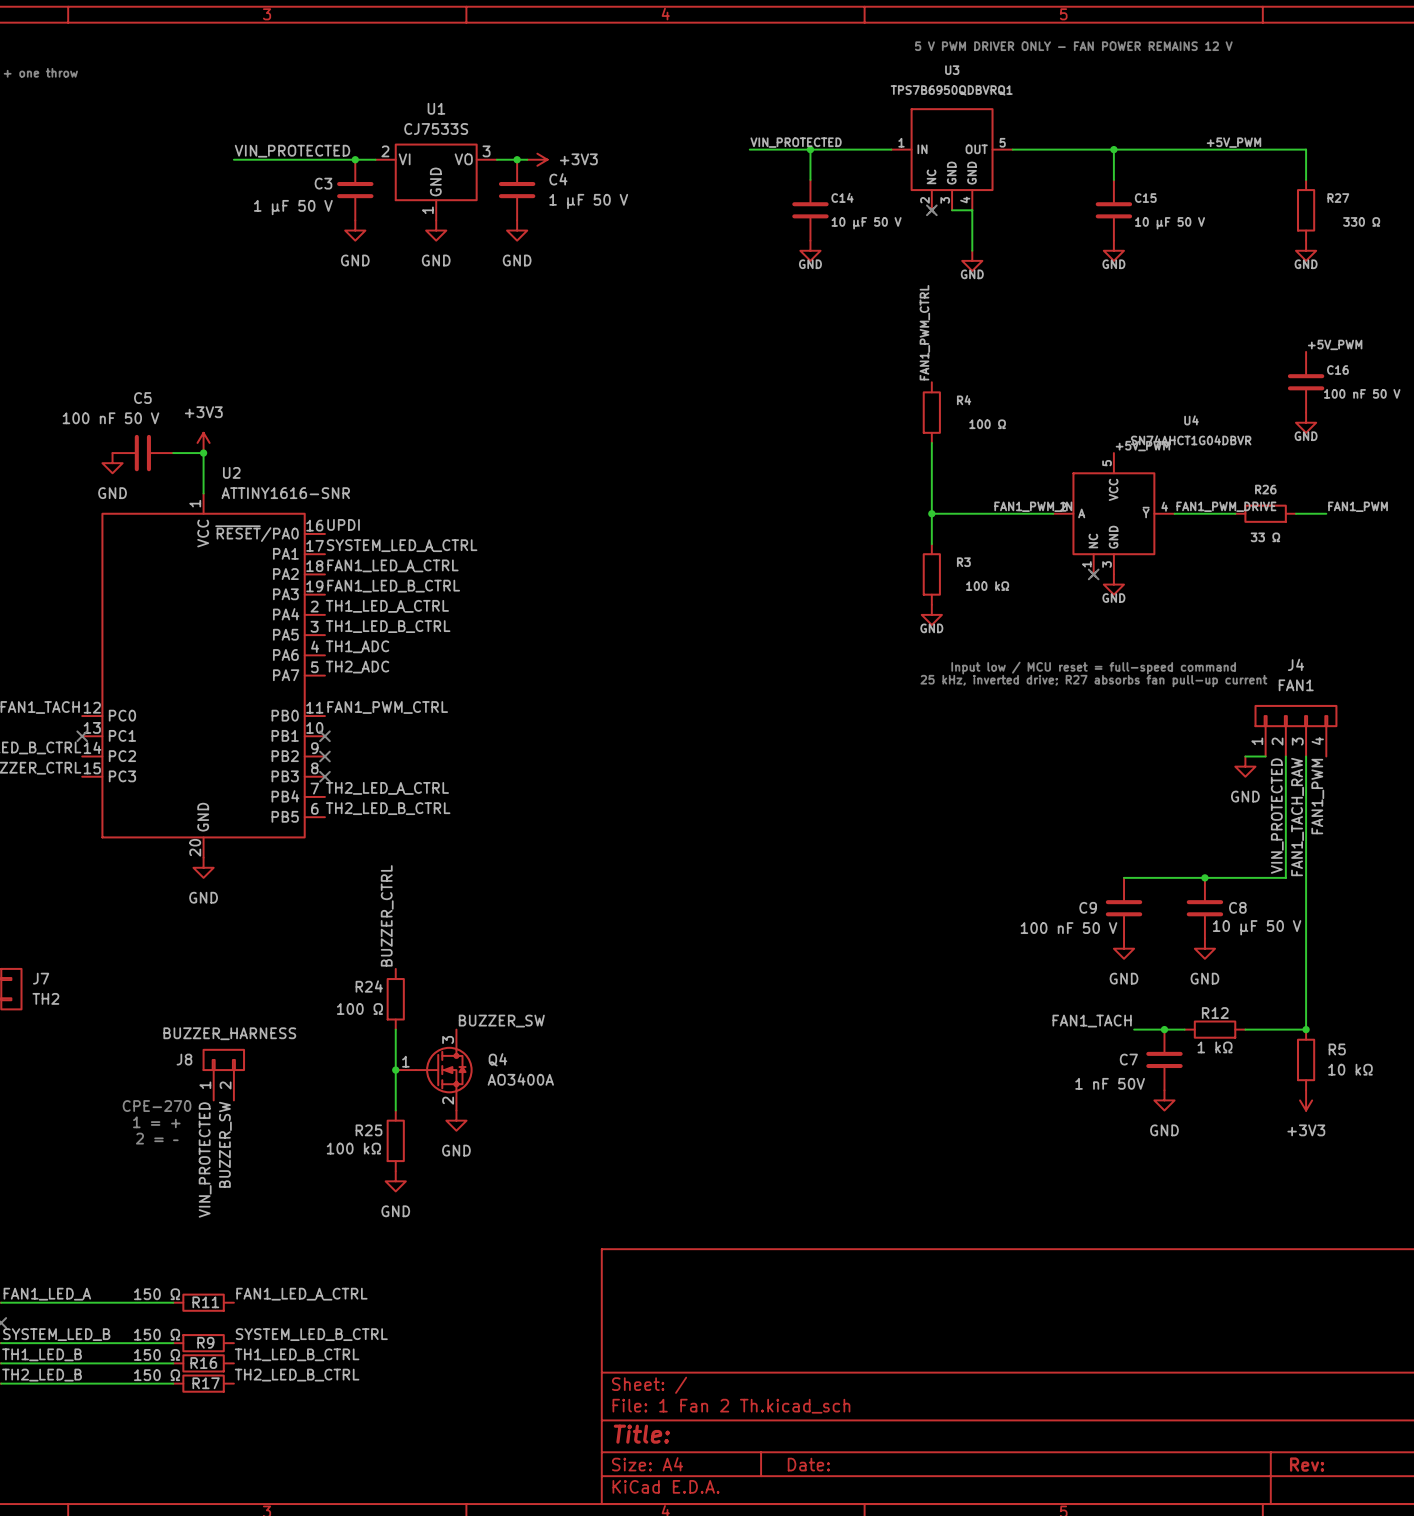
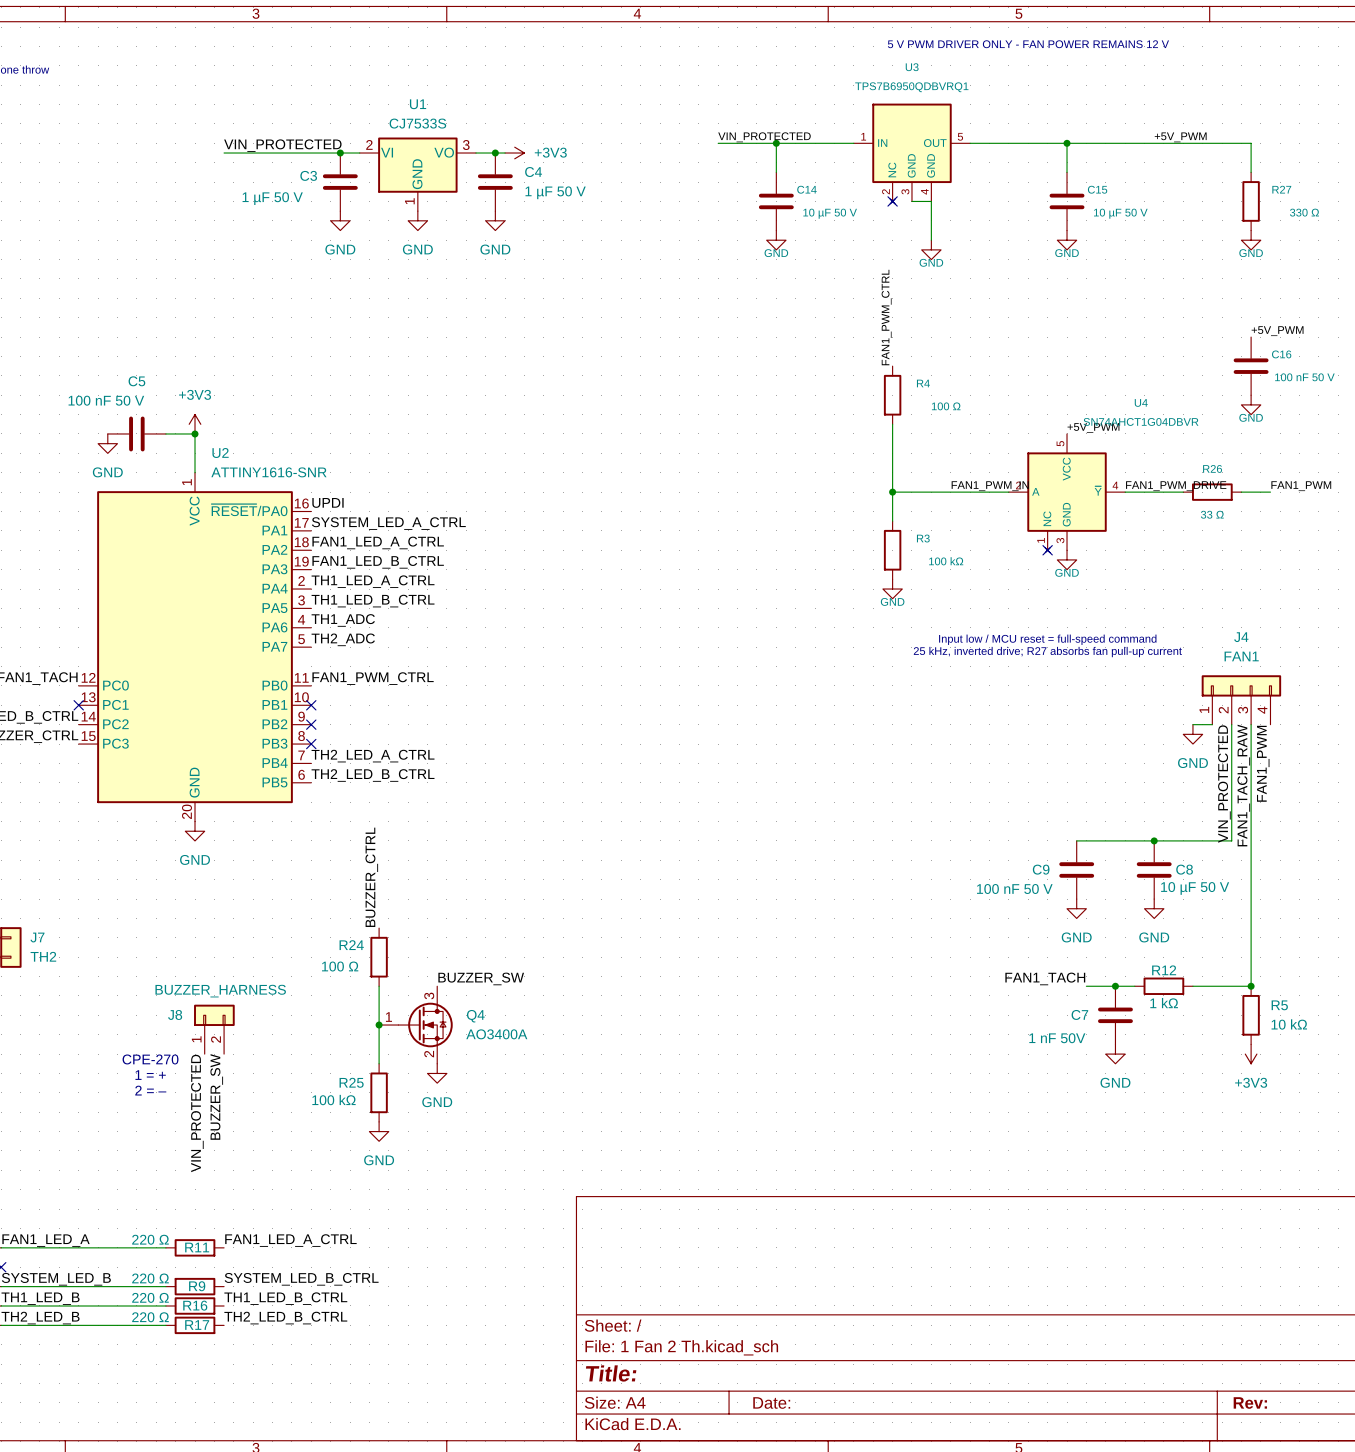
R11 value: 150 Ω (157, 1294) -> 220 Ω (150, 1239)
R9 value: 150 Ω (157, 1334) -> 220 Ω (150, 1278)
R16 value: 150 Ω (157, 1354) -> 220 Ω (150, 1297)
R17 value: 150 Ω (157, 1375) -> 220 Ω (150, 1317)

